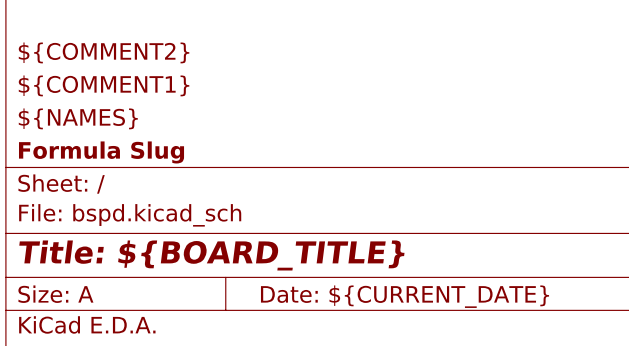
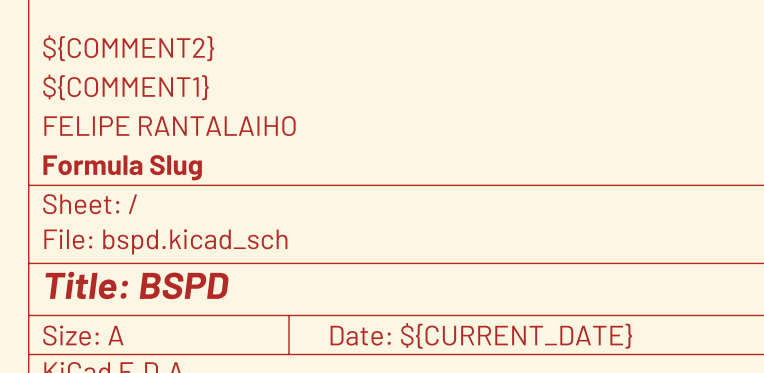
title block: ${NAMES} (78, 118) -> FELIPE RANTALAIHO (169, 126)
title block: Title: ${BOARD_TITLE} (211, 255) -> Title: BSPD (137, 285)

